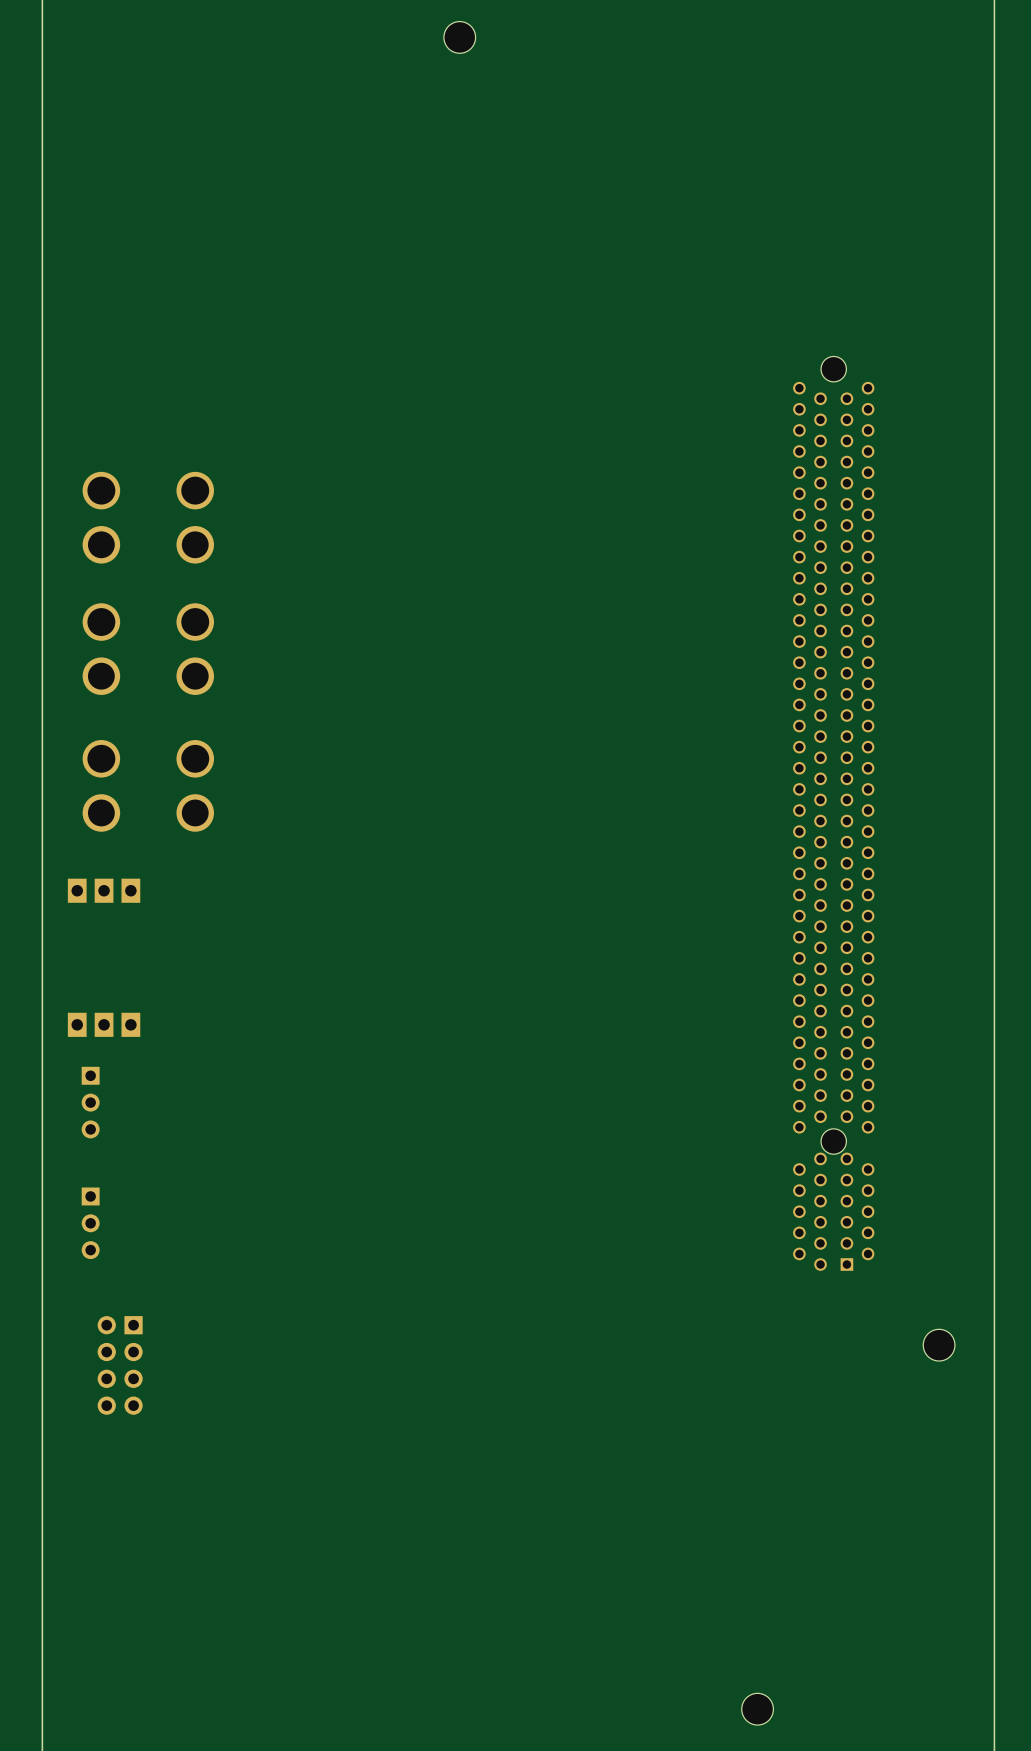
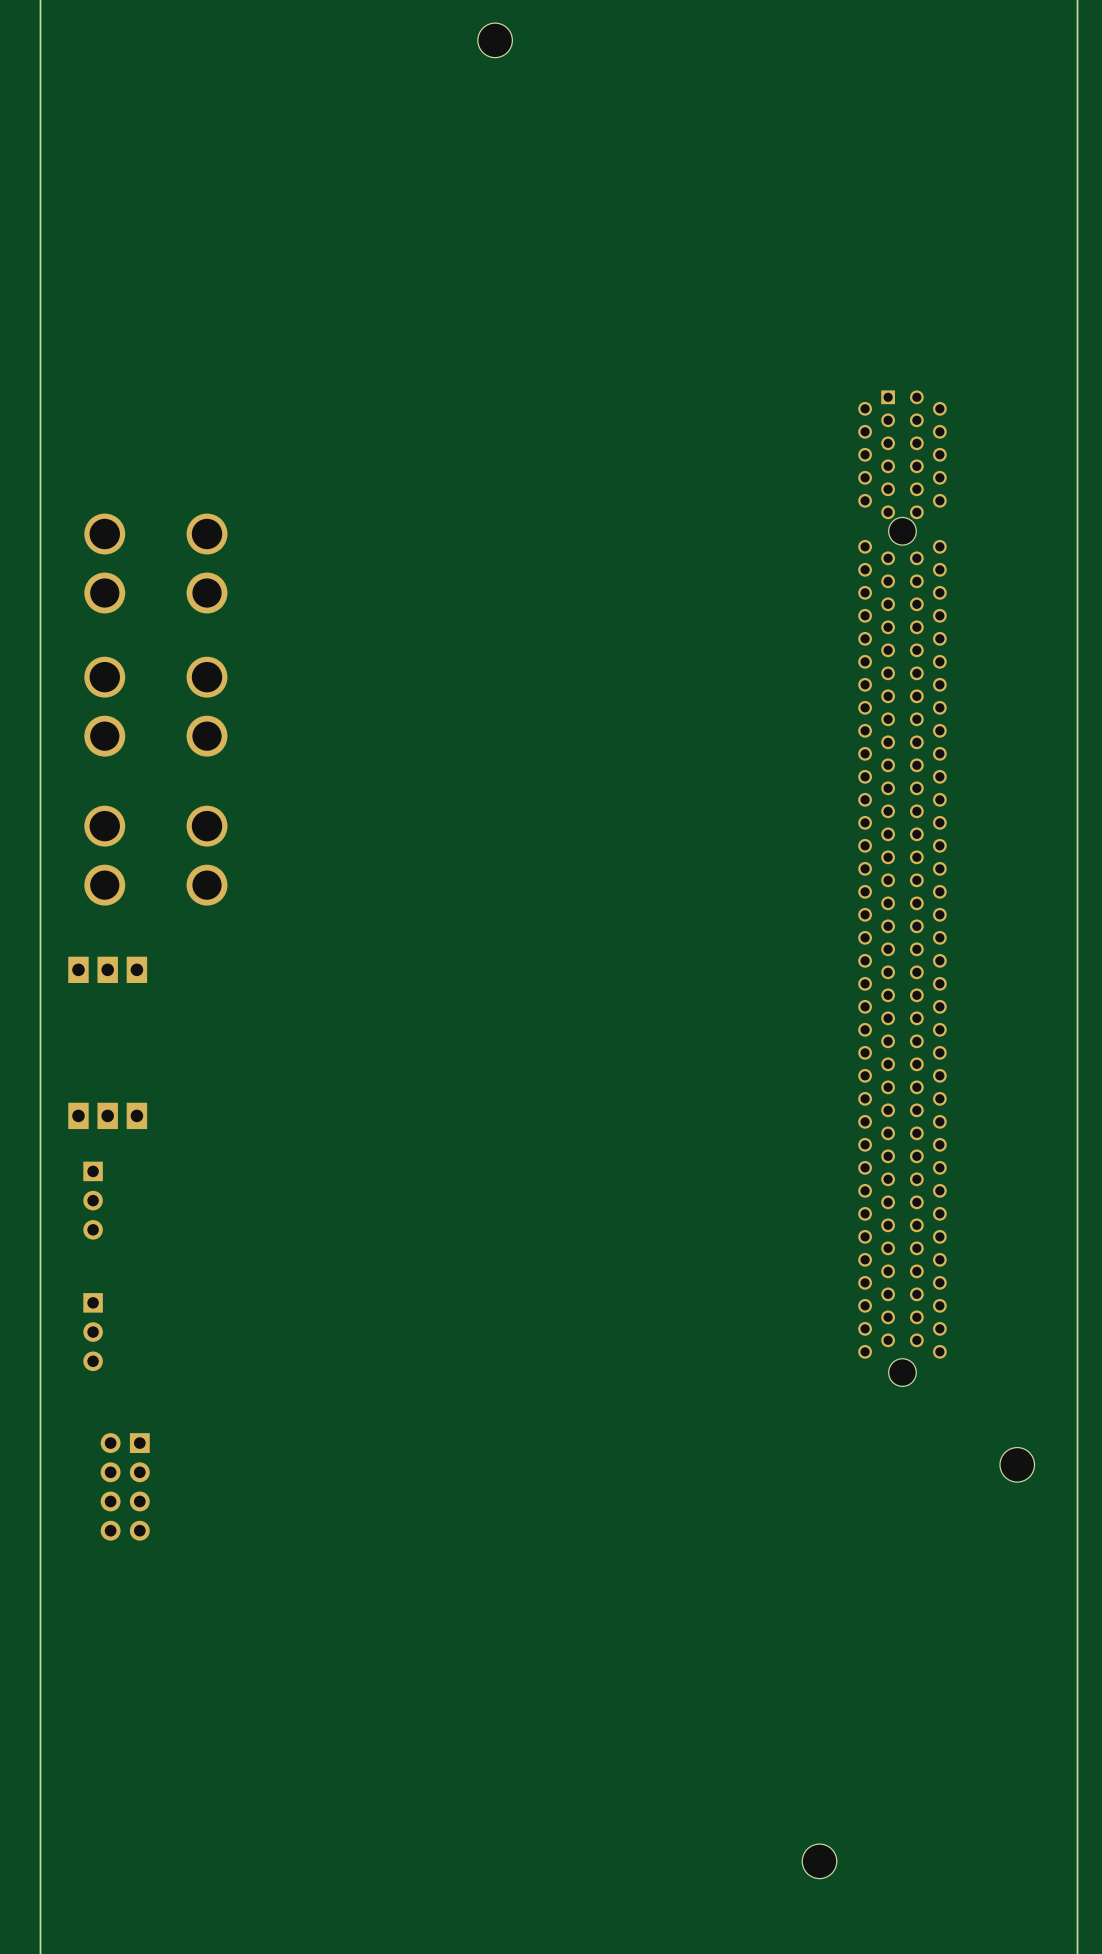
part rotation: 0° (833, 813) -> 180° (902, 888)

